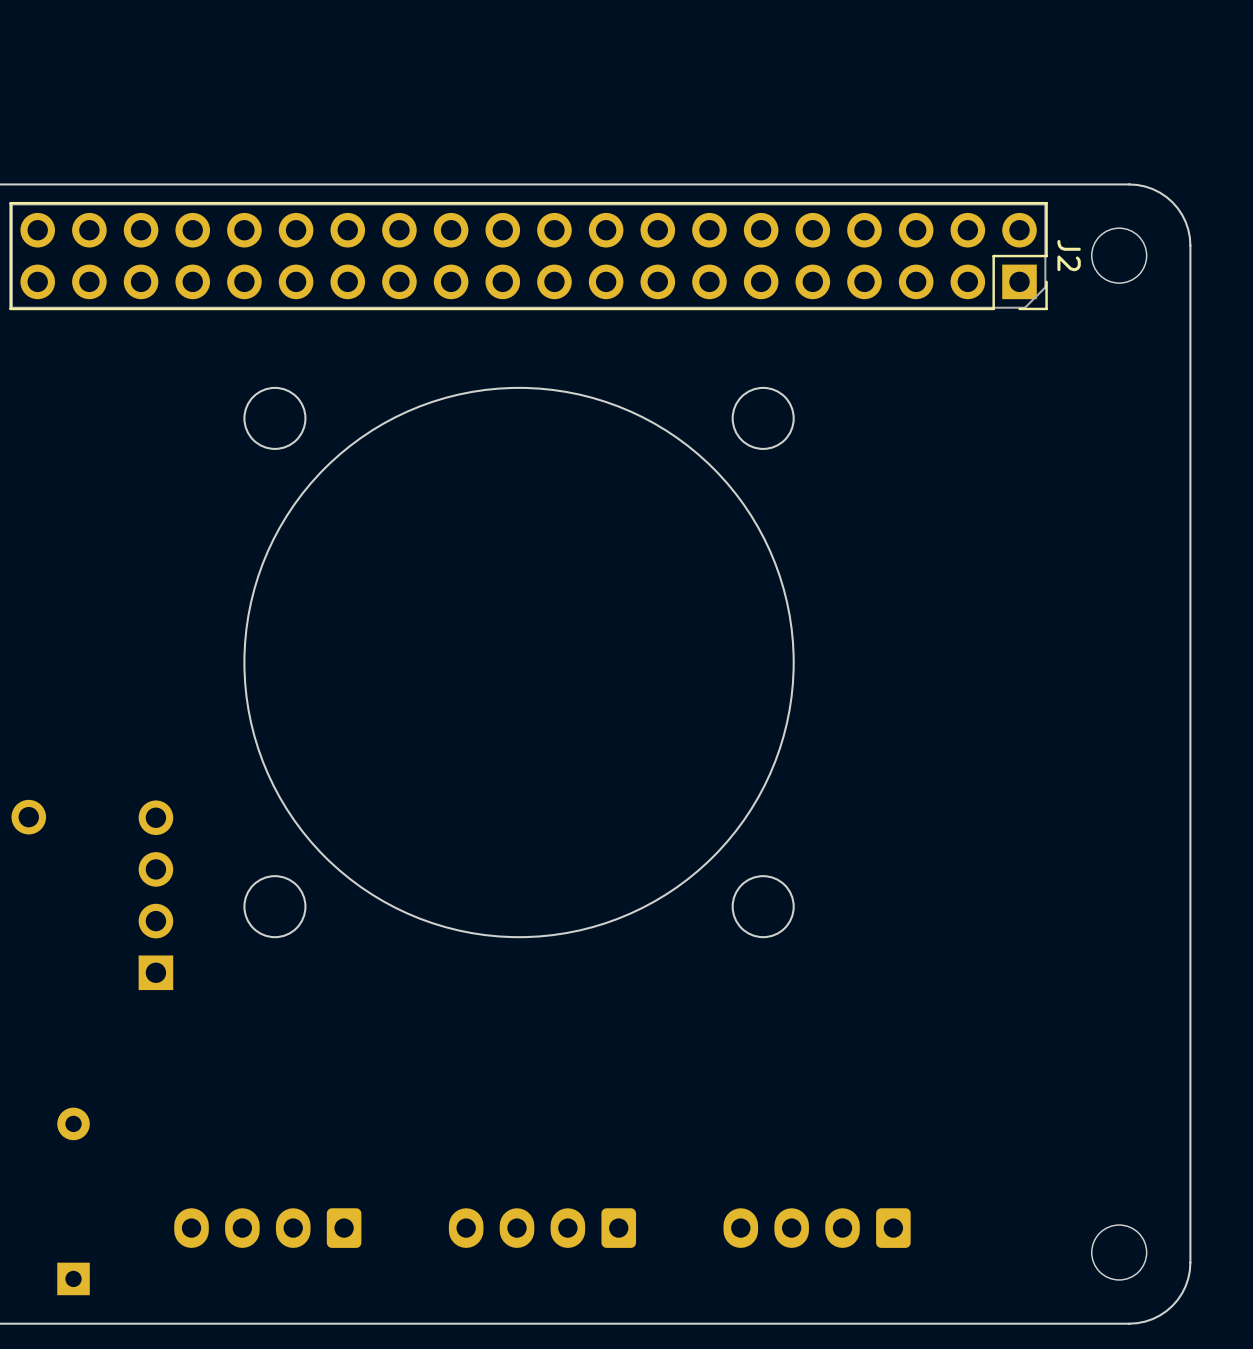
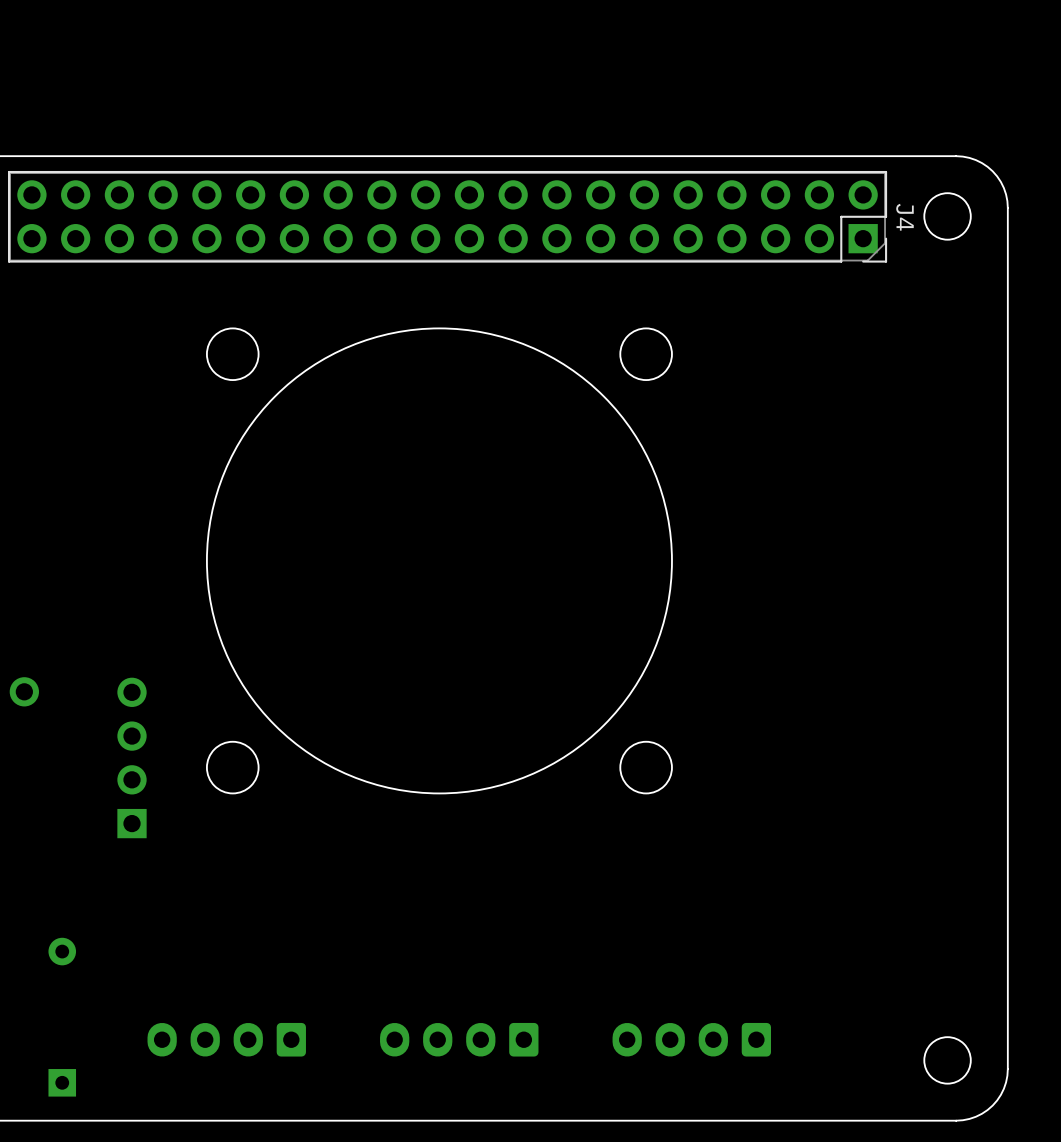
J2 name: J2 (1069, 255) -> J4 (904, 217)

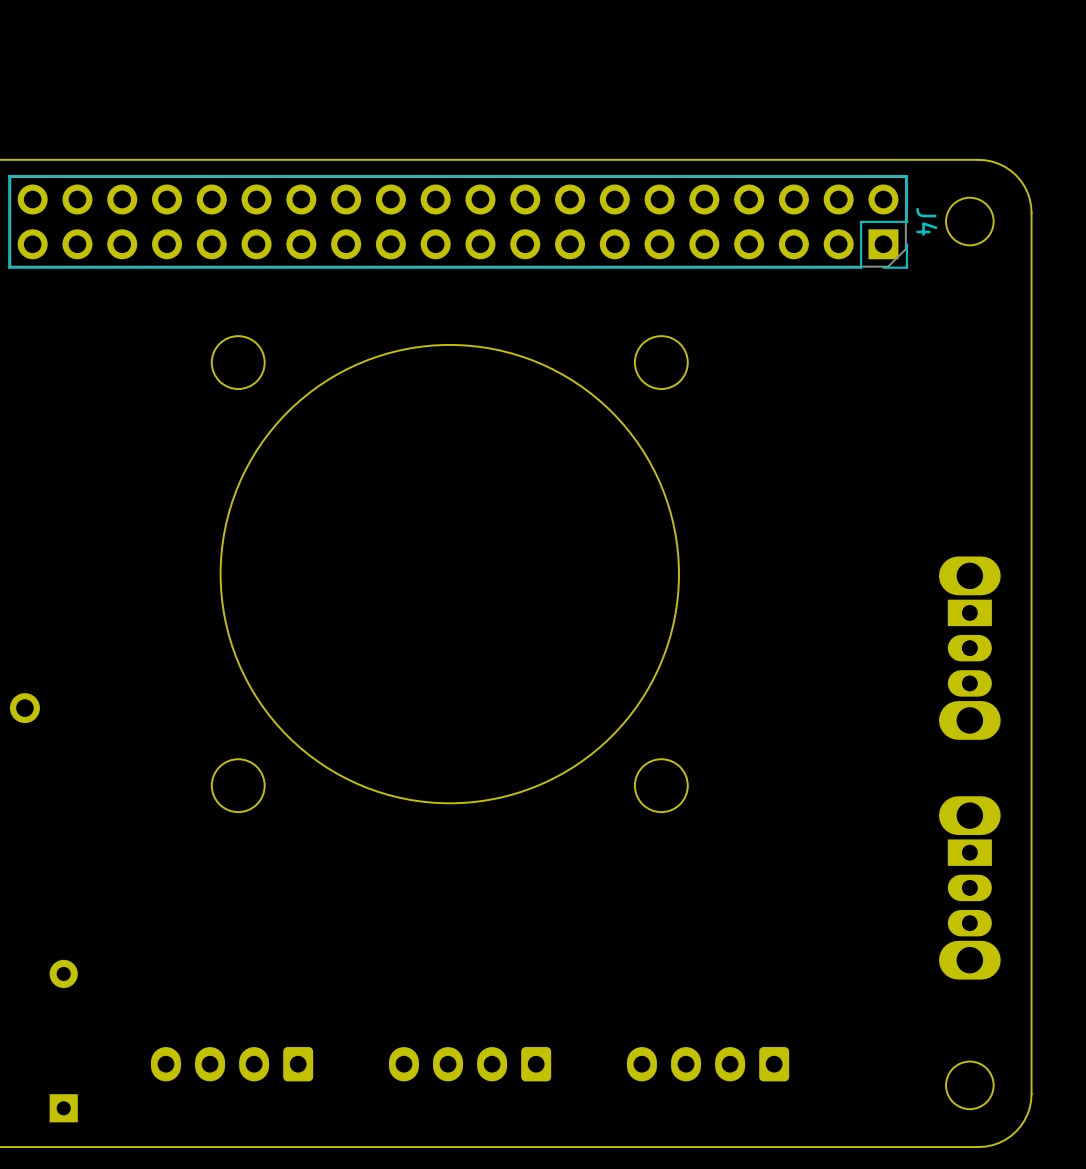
round board edge size: [206, 327, 673, 795] -> [219, 344, 680, 805]
part: none -> (969, 648)
part: (132, 757) -> none
part: none -> (969, 887)

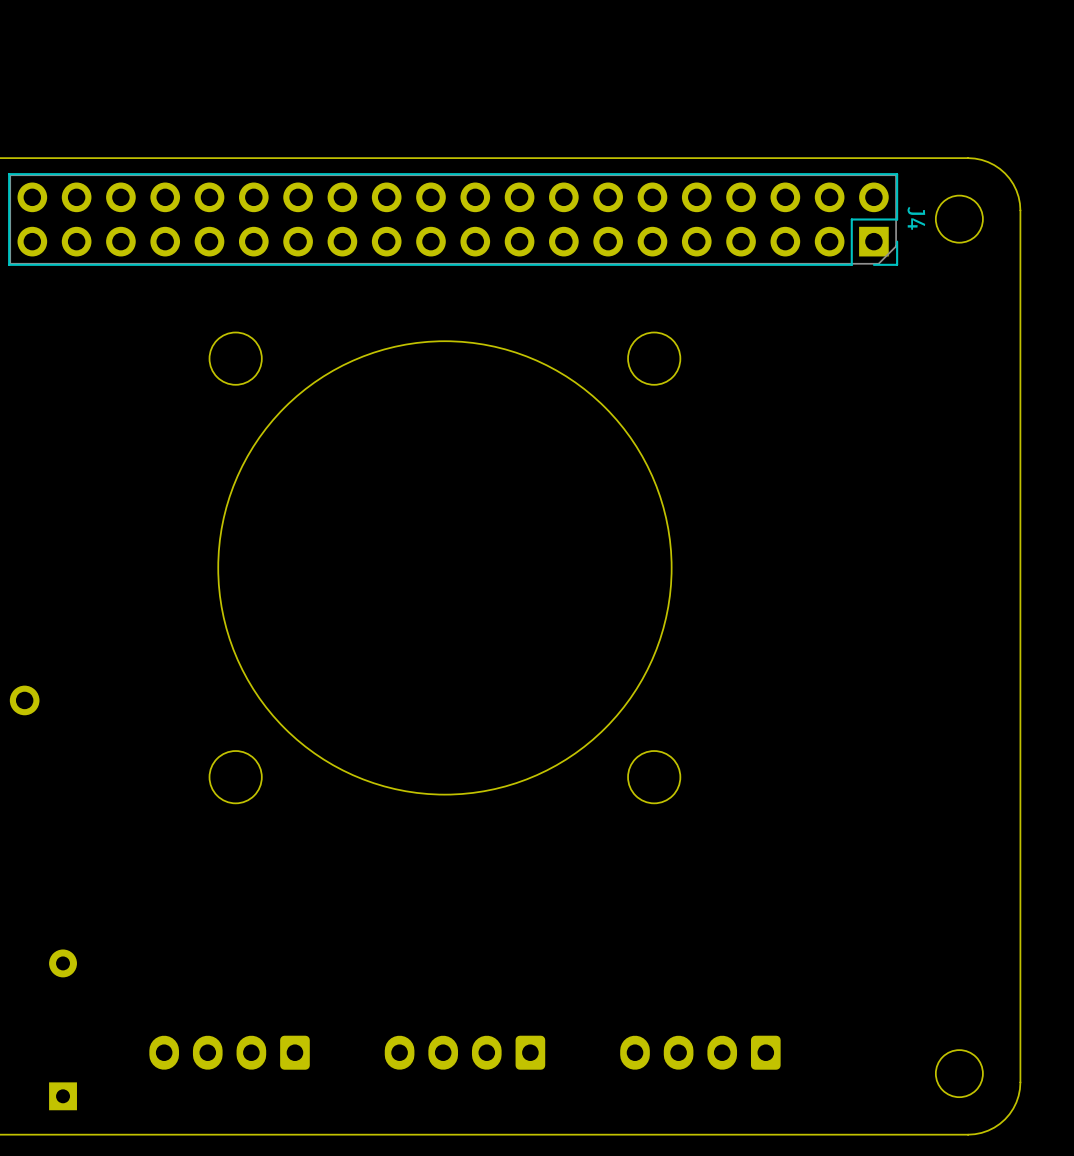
part: (969, 648) -> none
part: (969, 887) -> none

